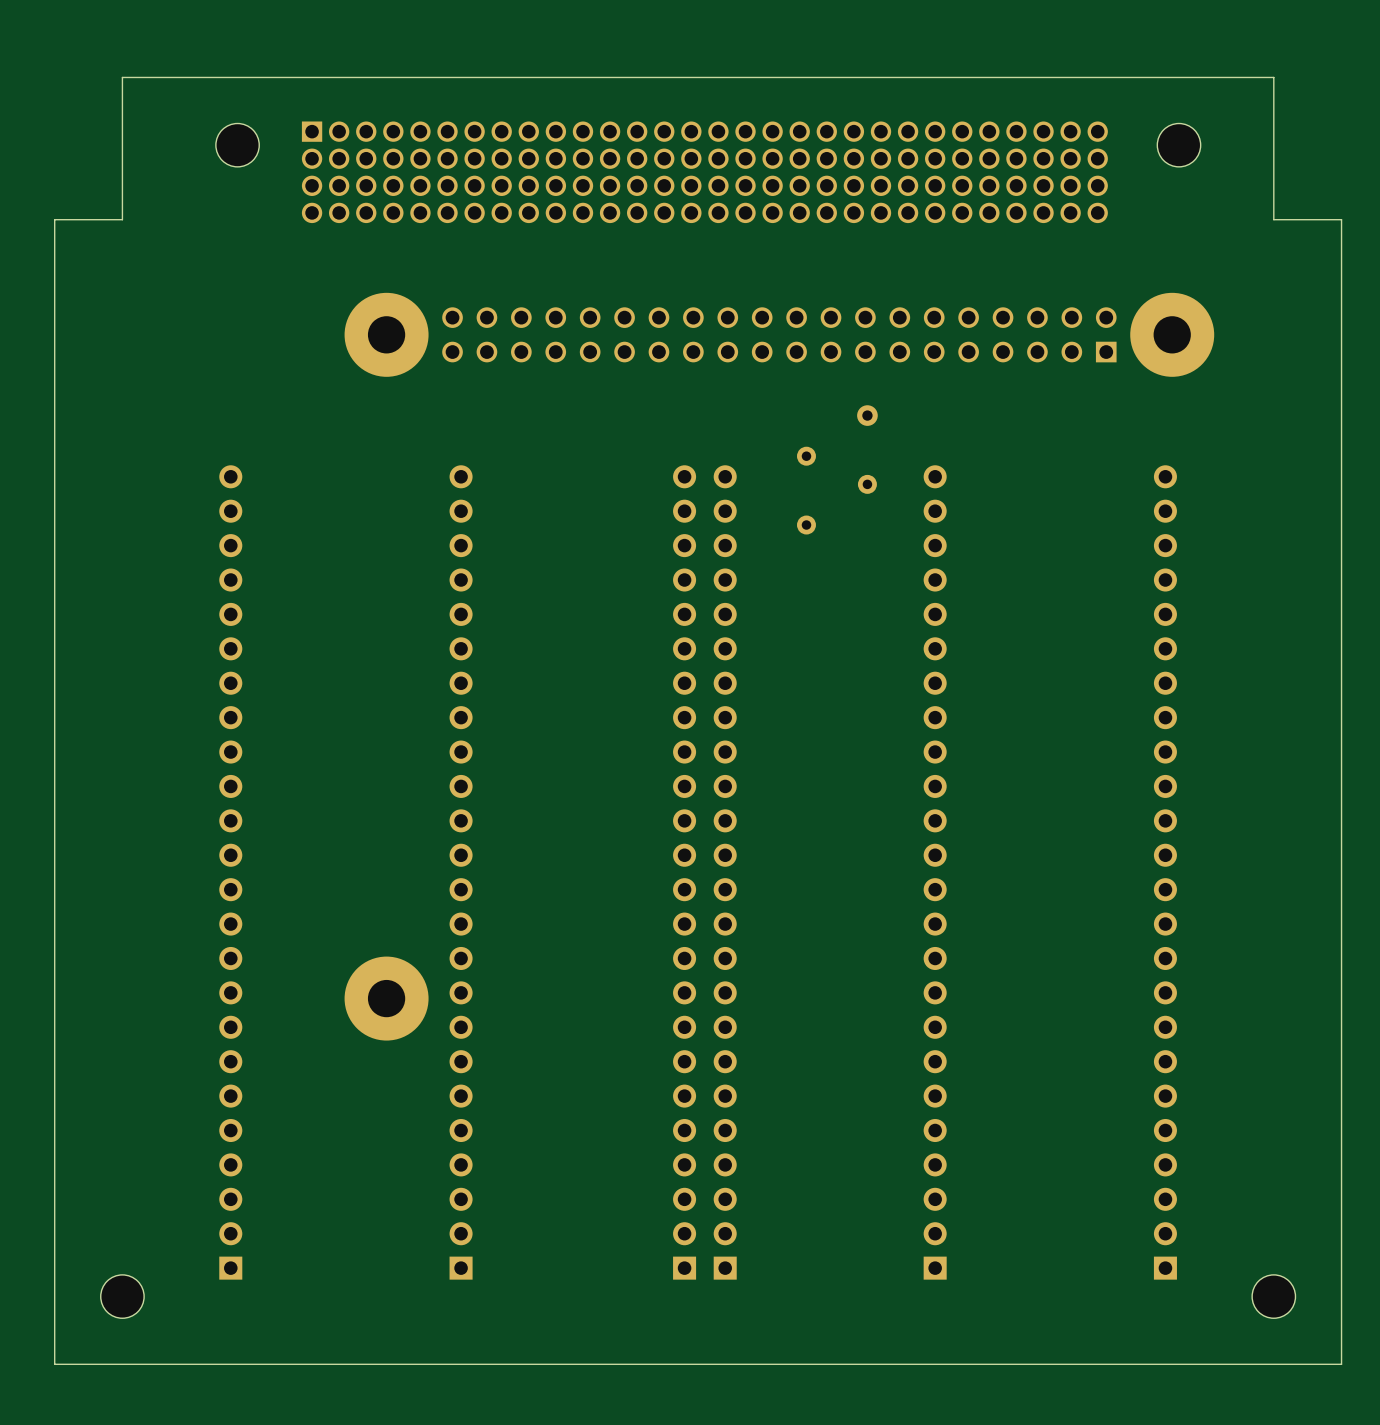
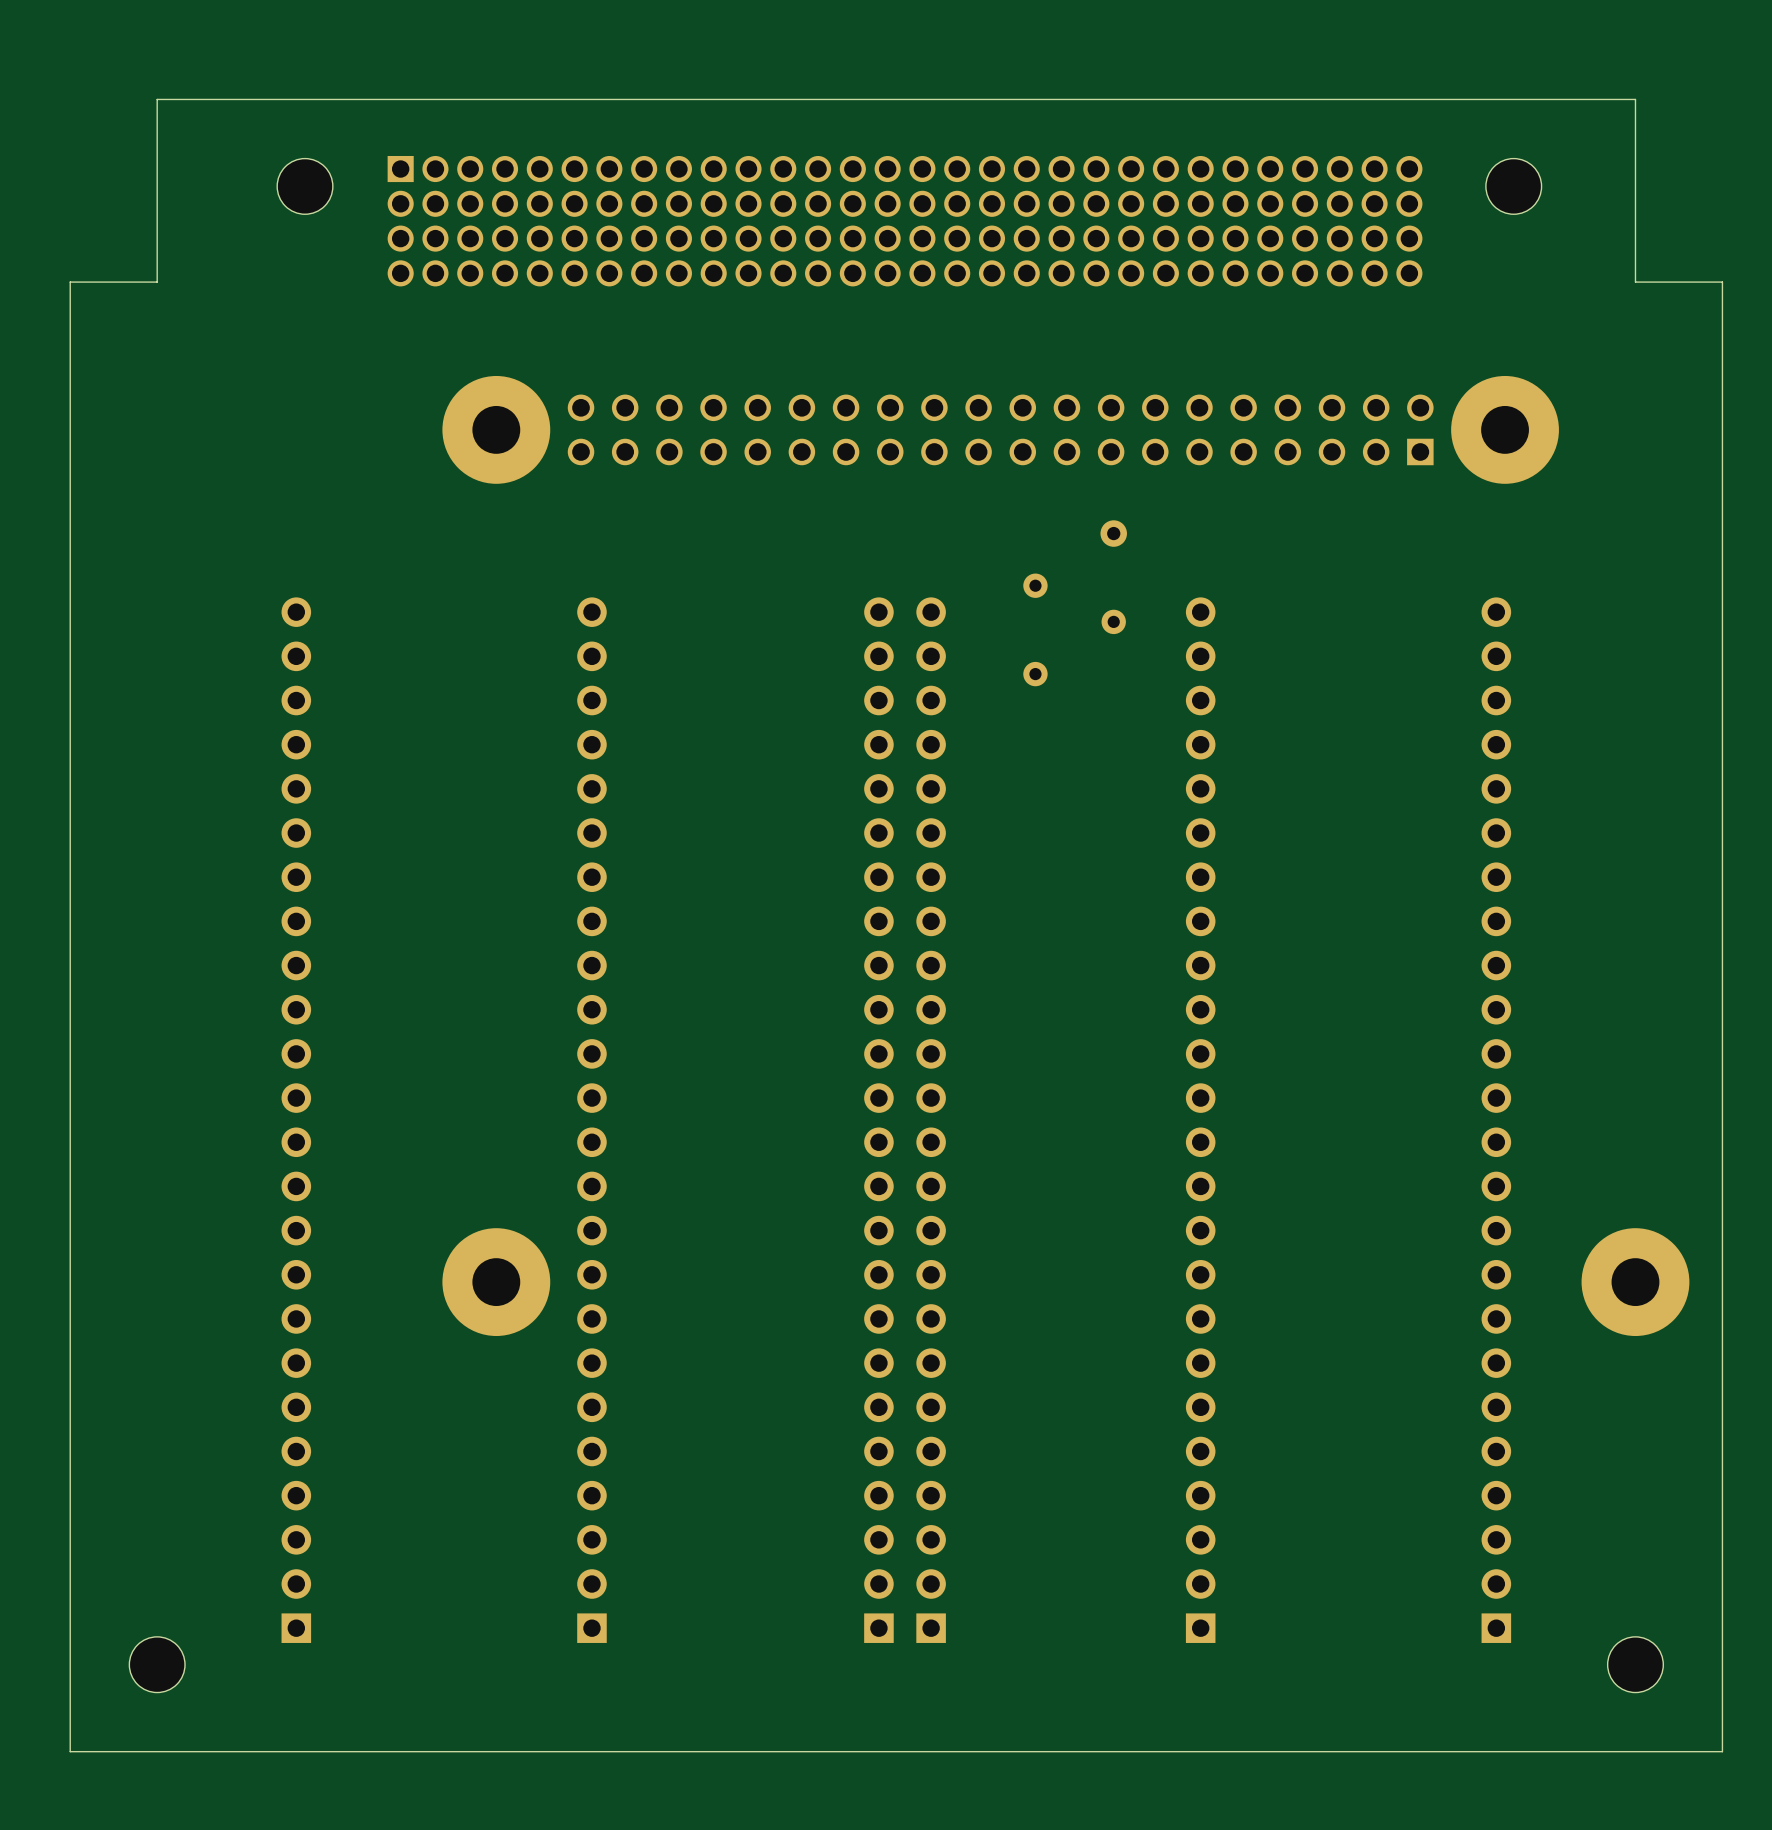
part: none -> (1635, 1282)

